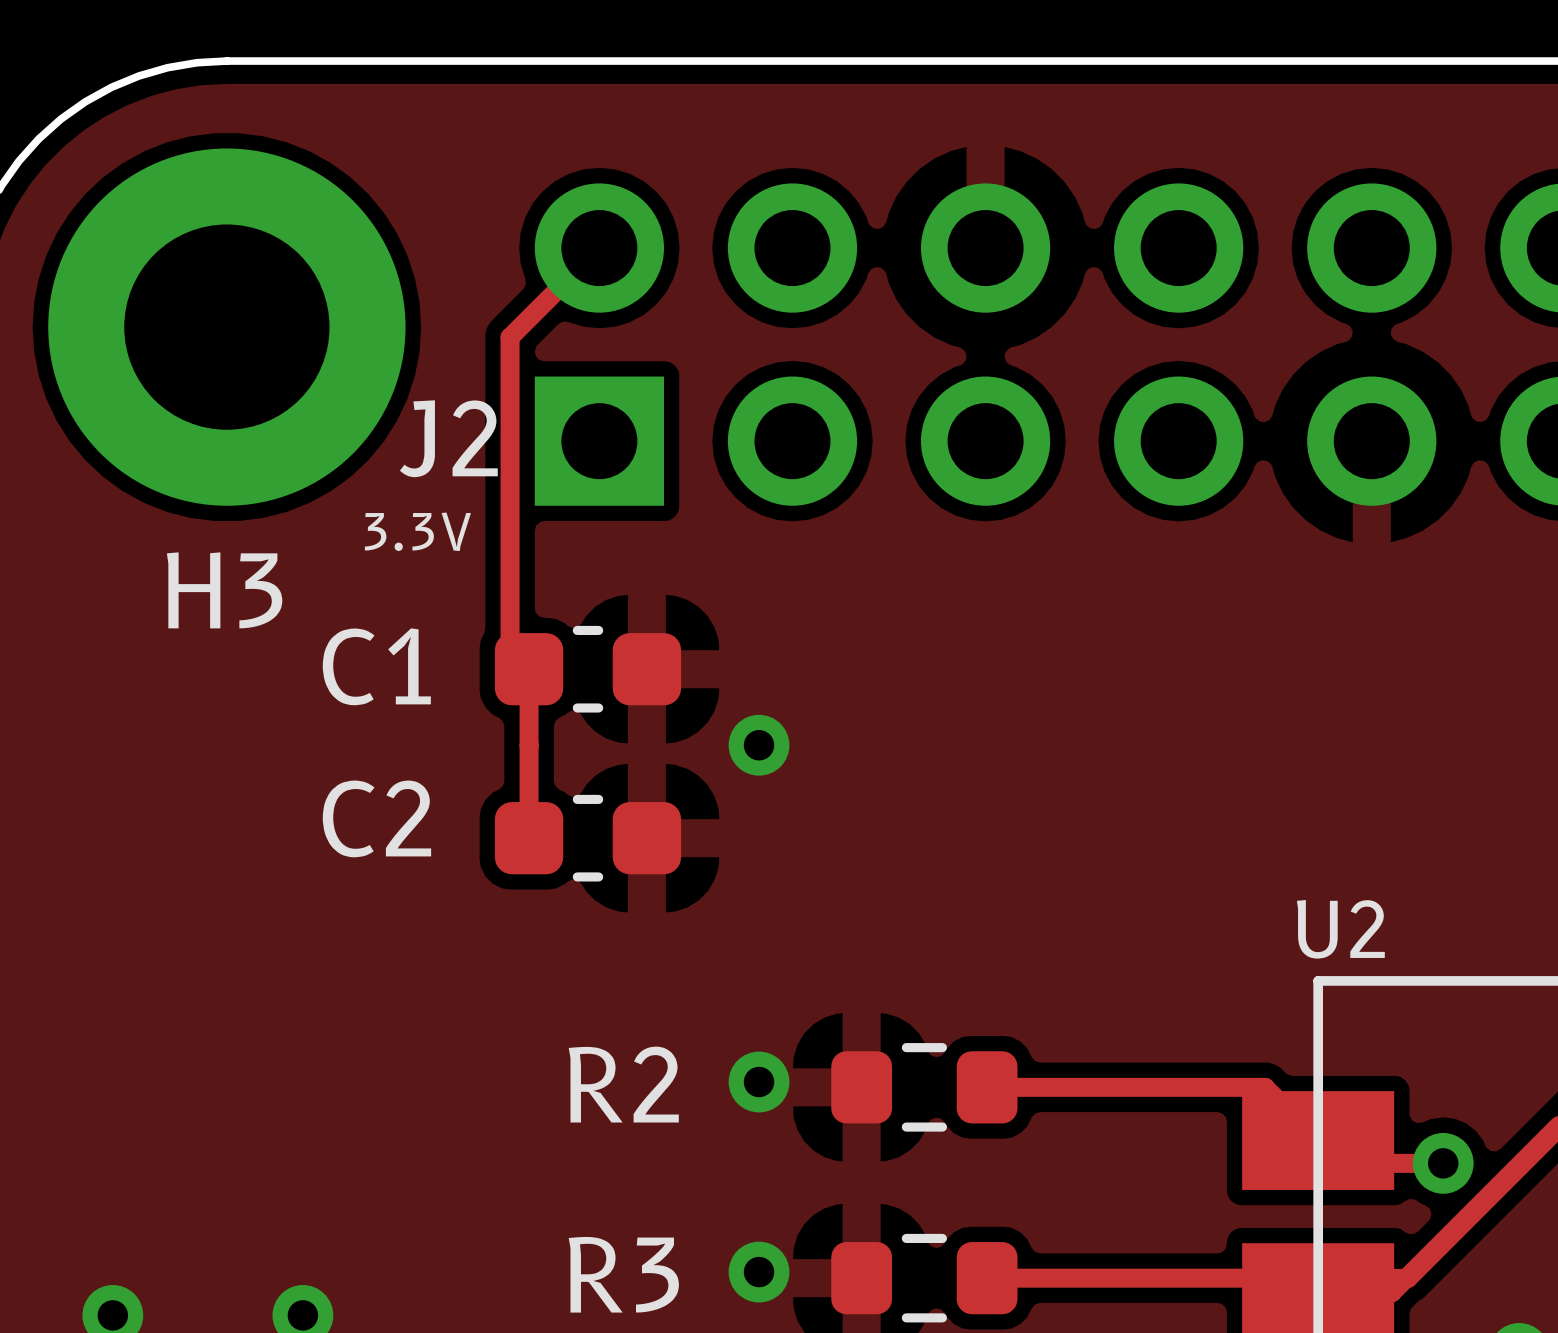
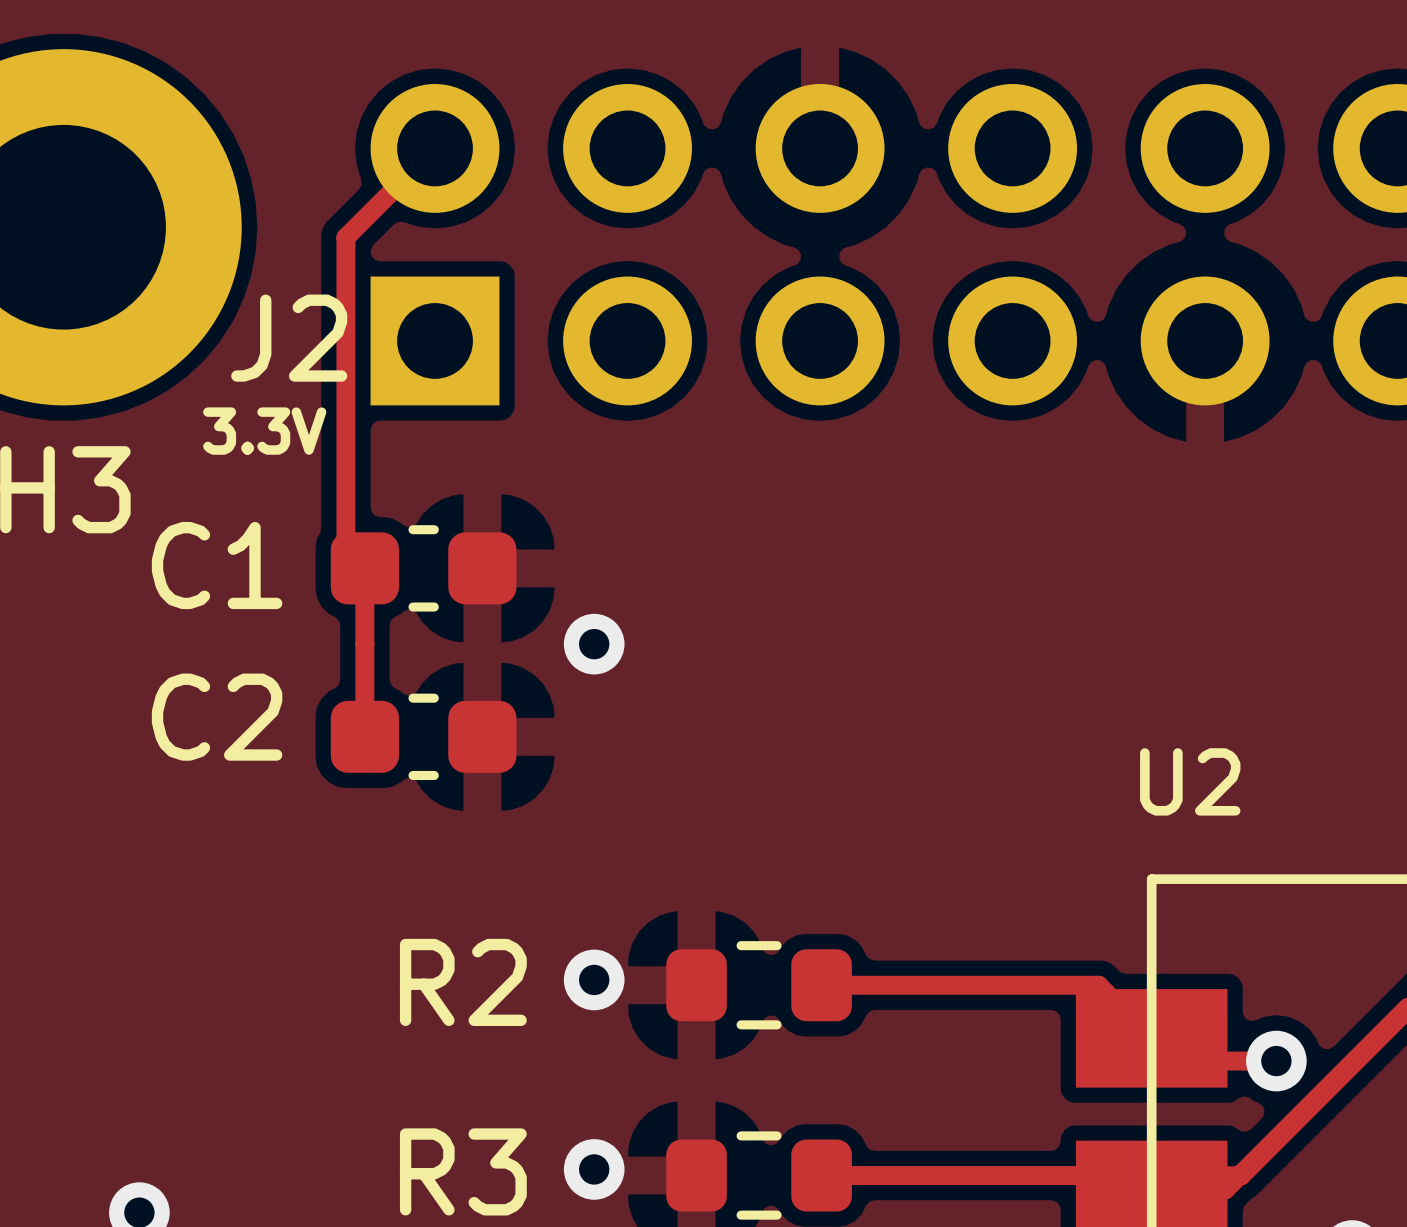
U2 name position: U2 (1340, 929) -> U2 (1190, 781)

